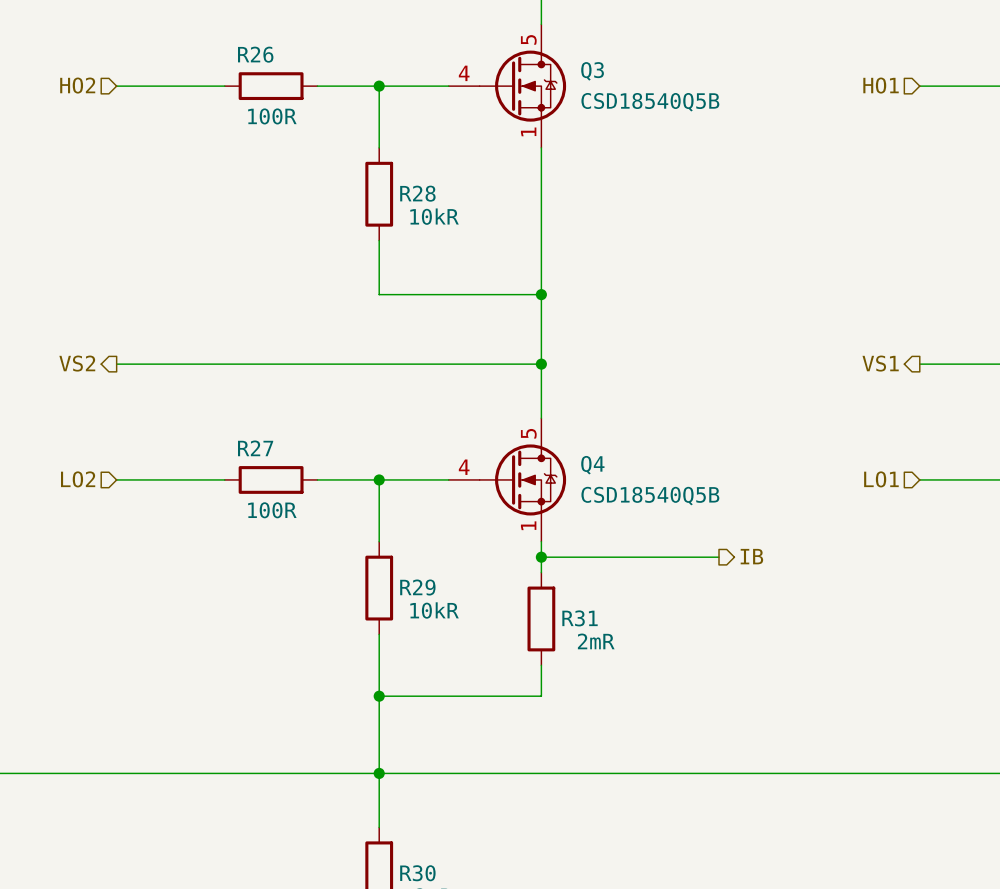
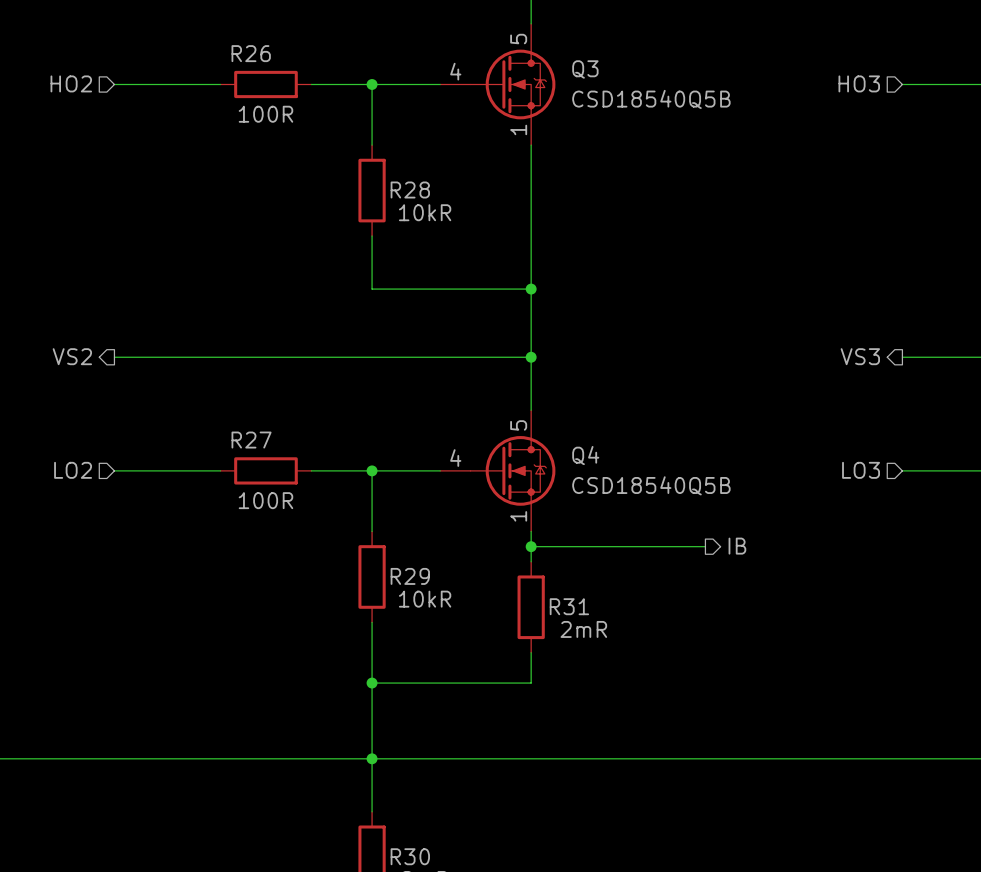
hierarchical label: HO1 (881, 85) -> HO3 (859, 83)
hierarchical label: VS1 (880, 363) -> VS3 (860, 356)
hierarchical label: LO1 (881, 479) -> LO3 (861, 470)

